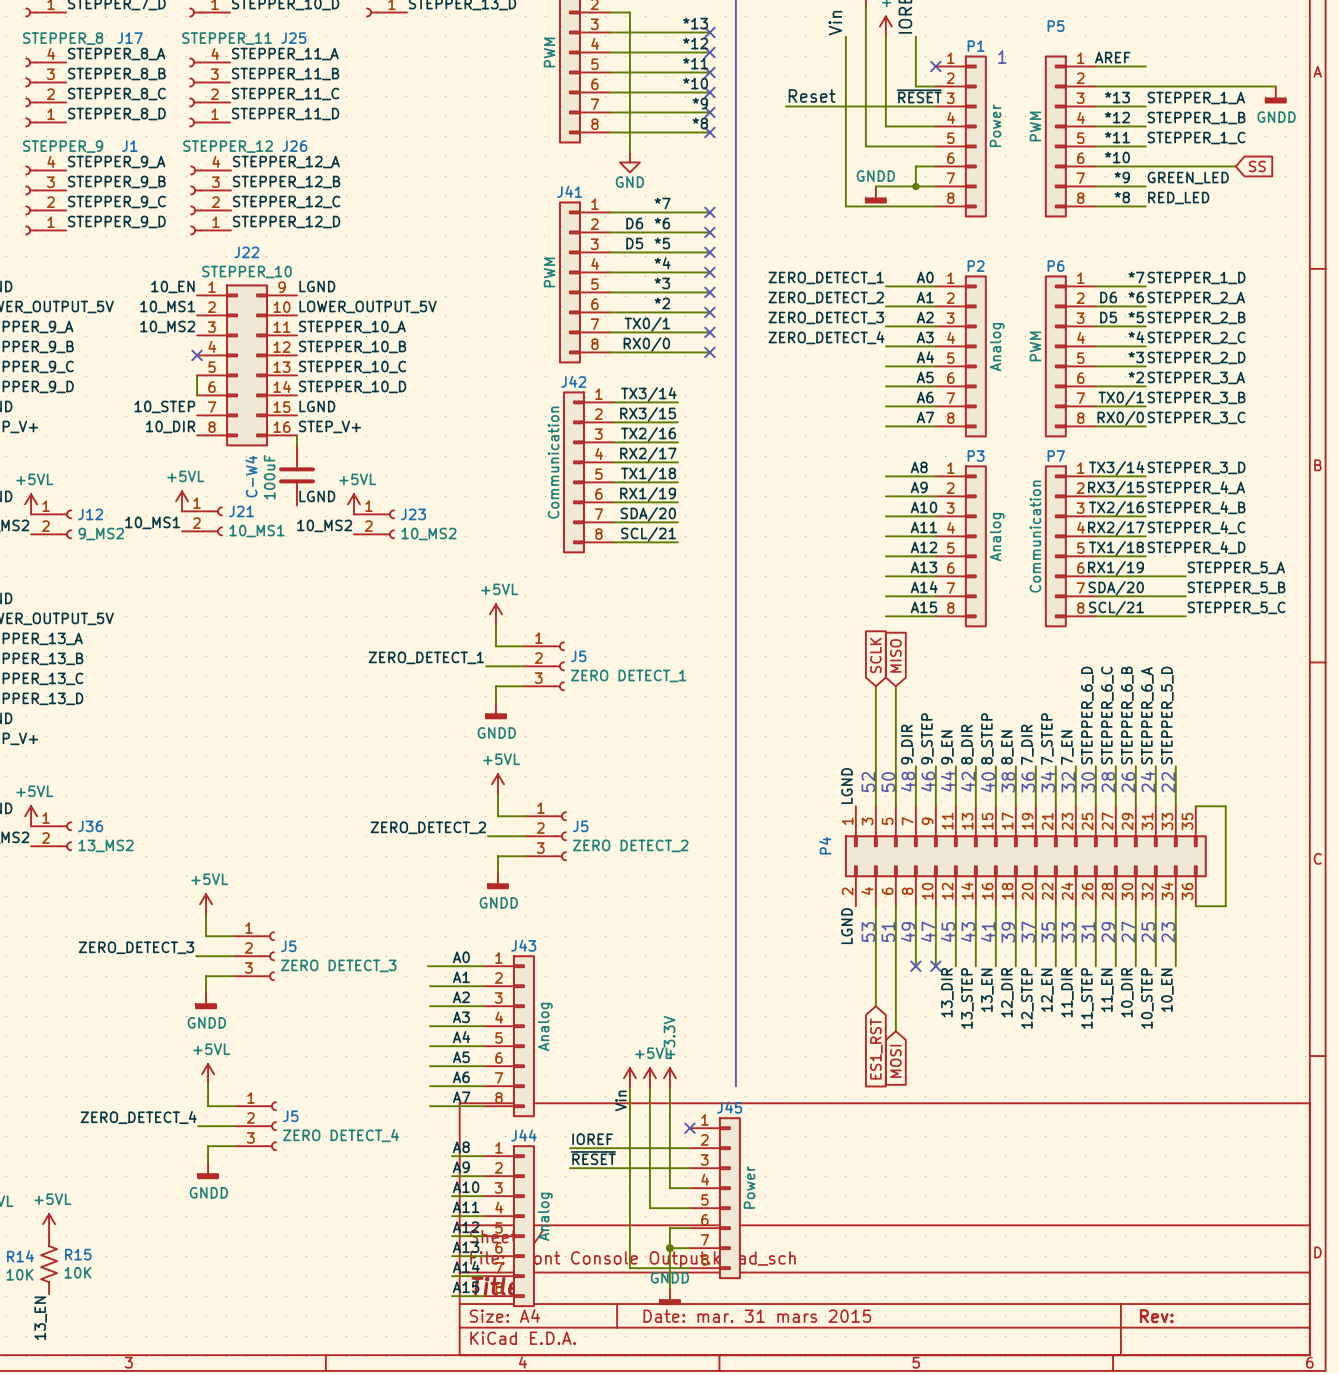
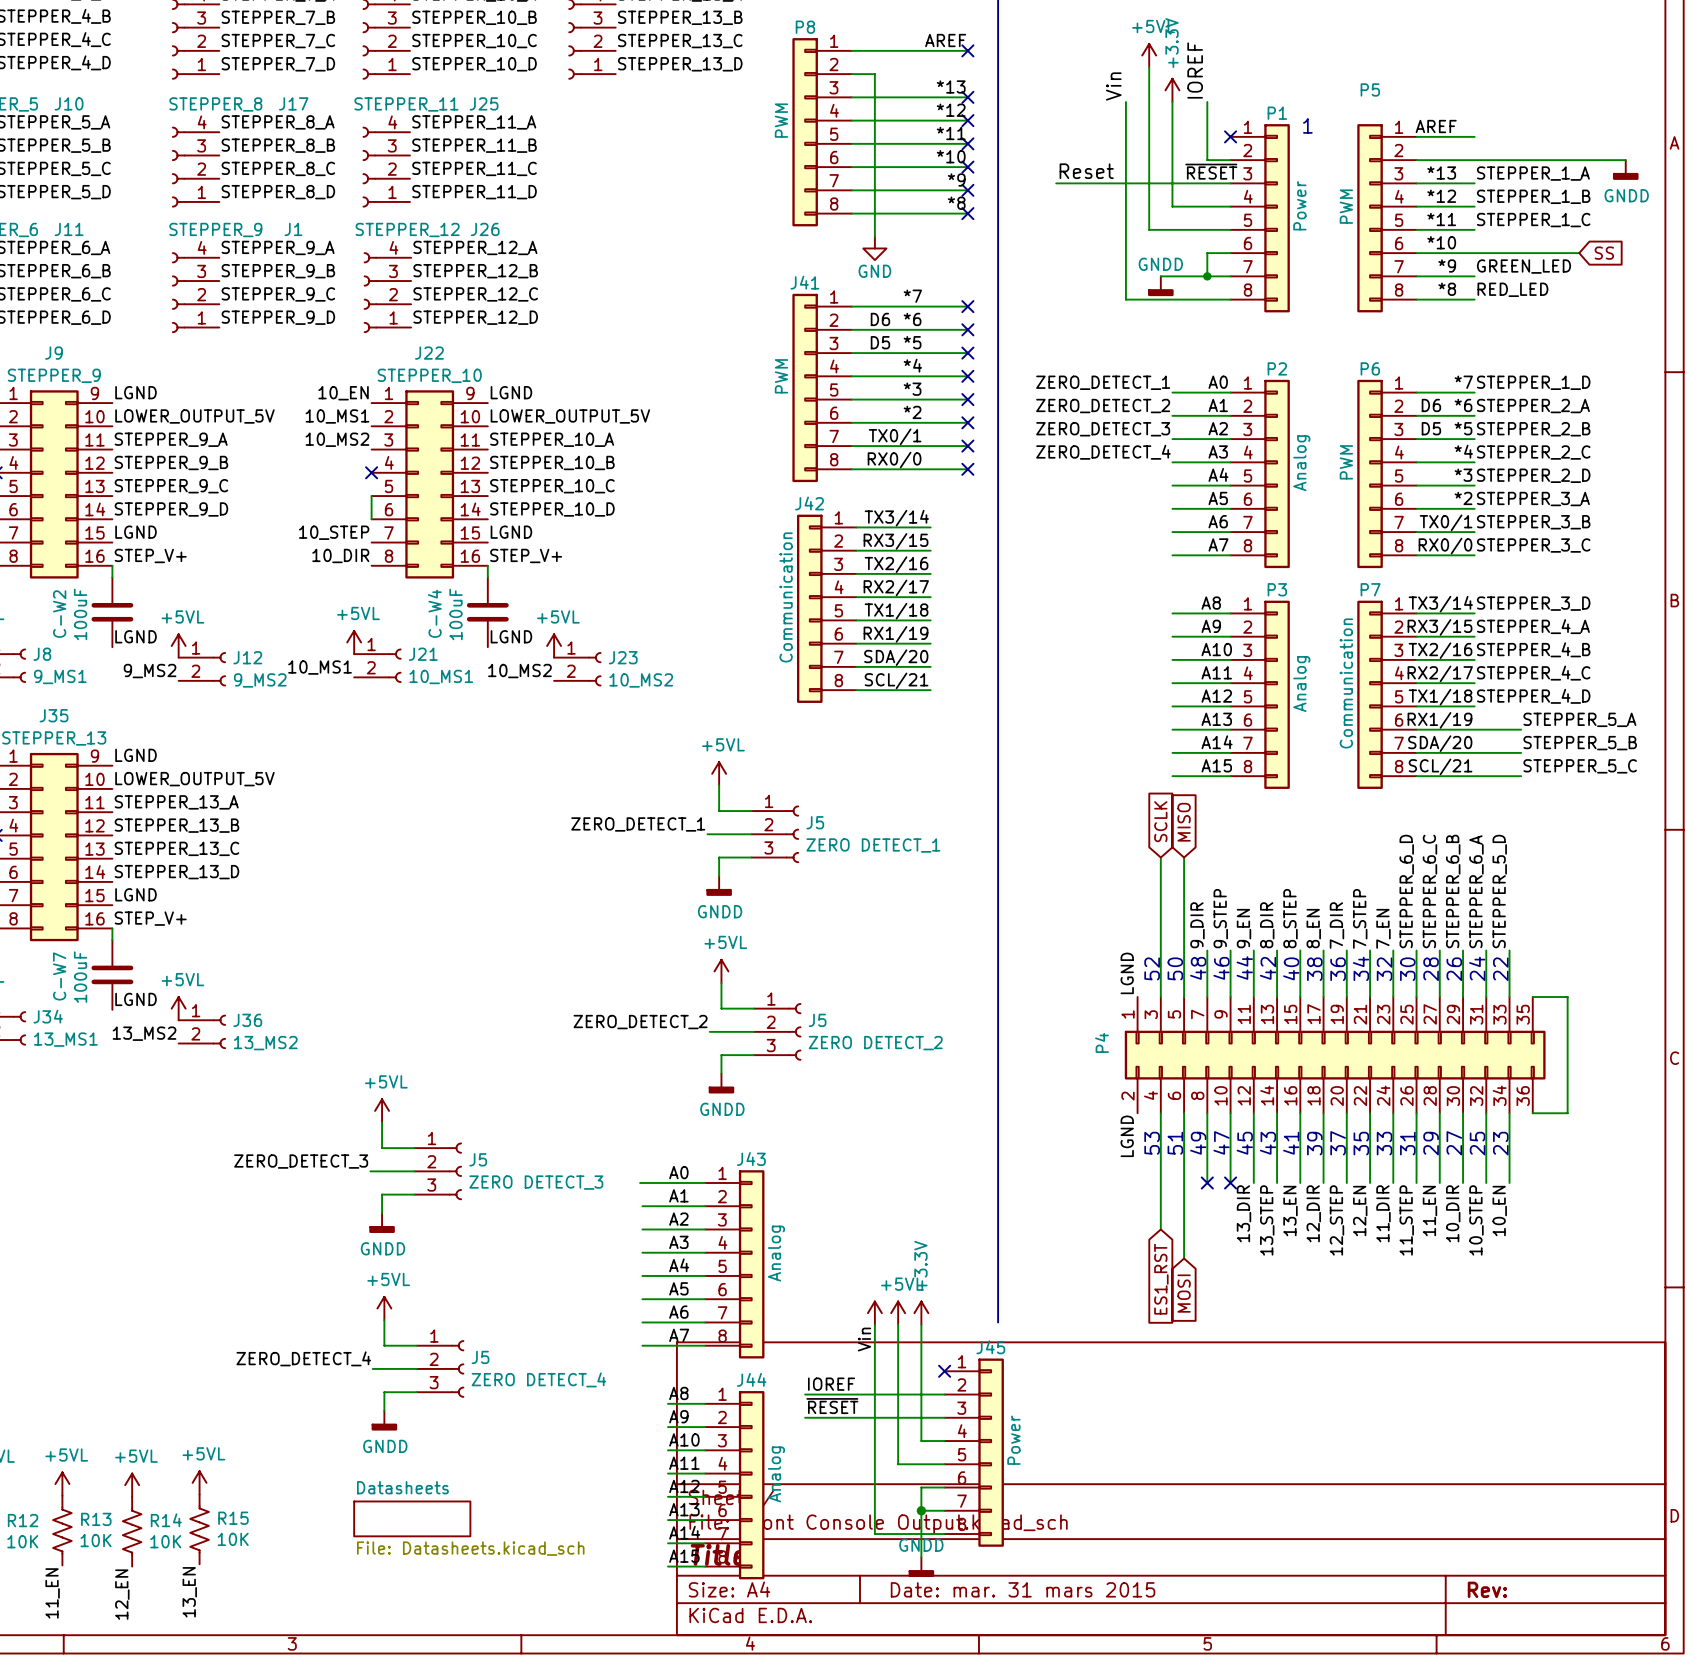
sheet Datasheets: none -> File: Datasheets.kicad_sch (412, 1518)

